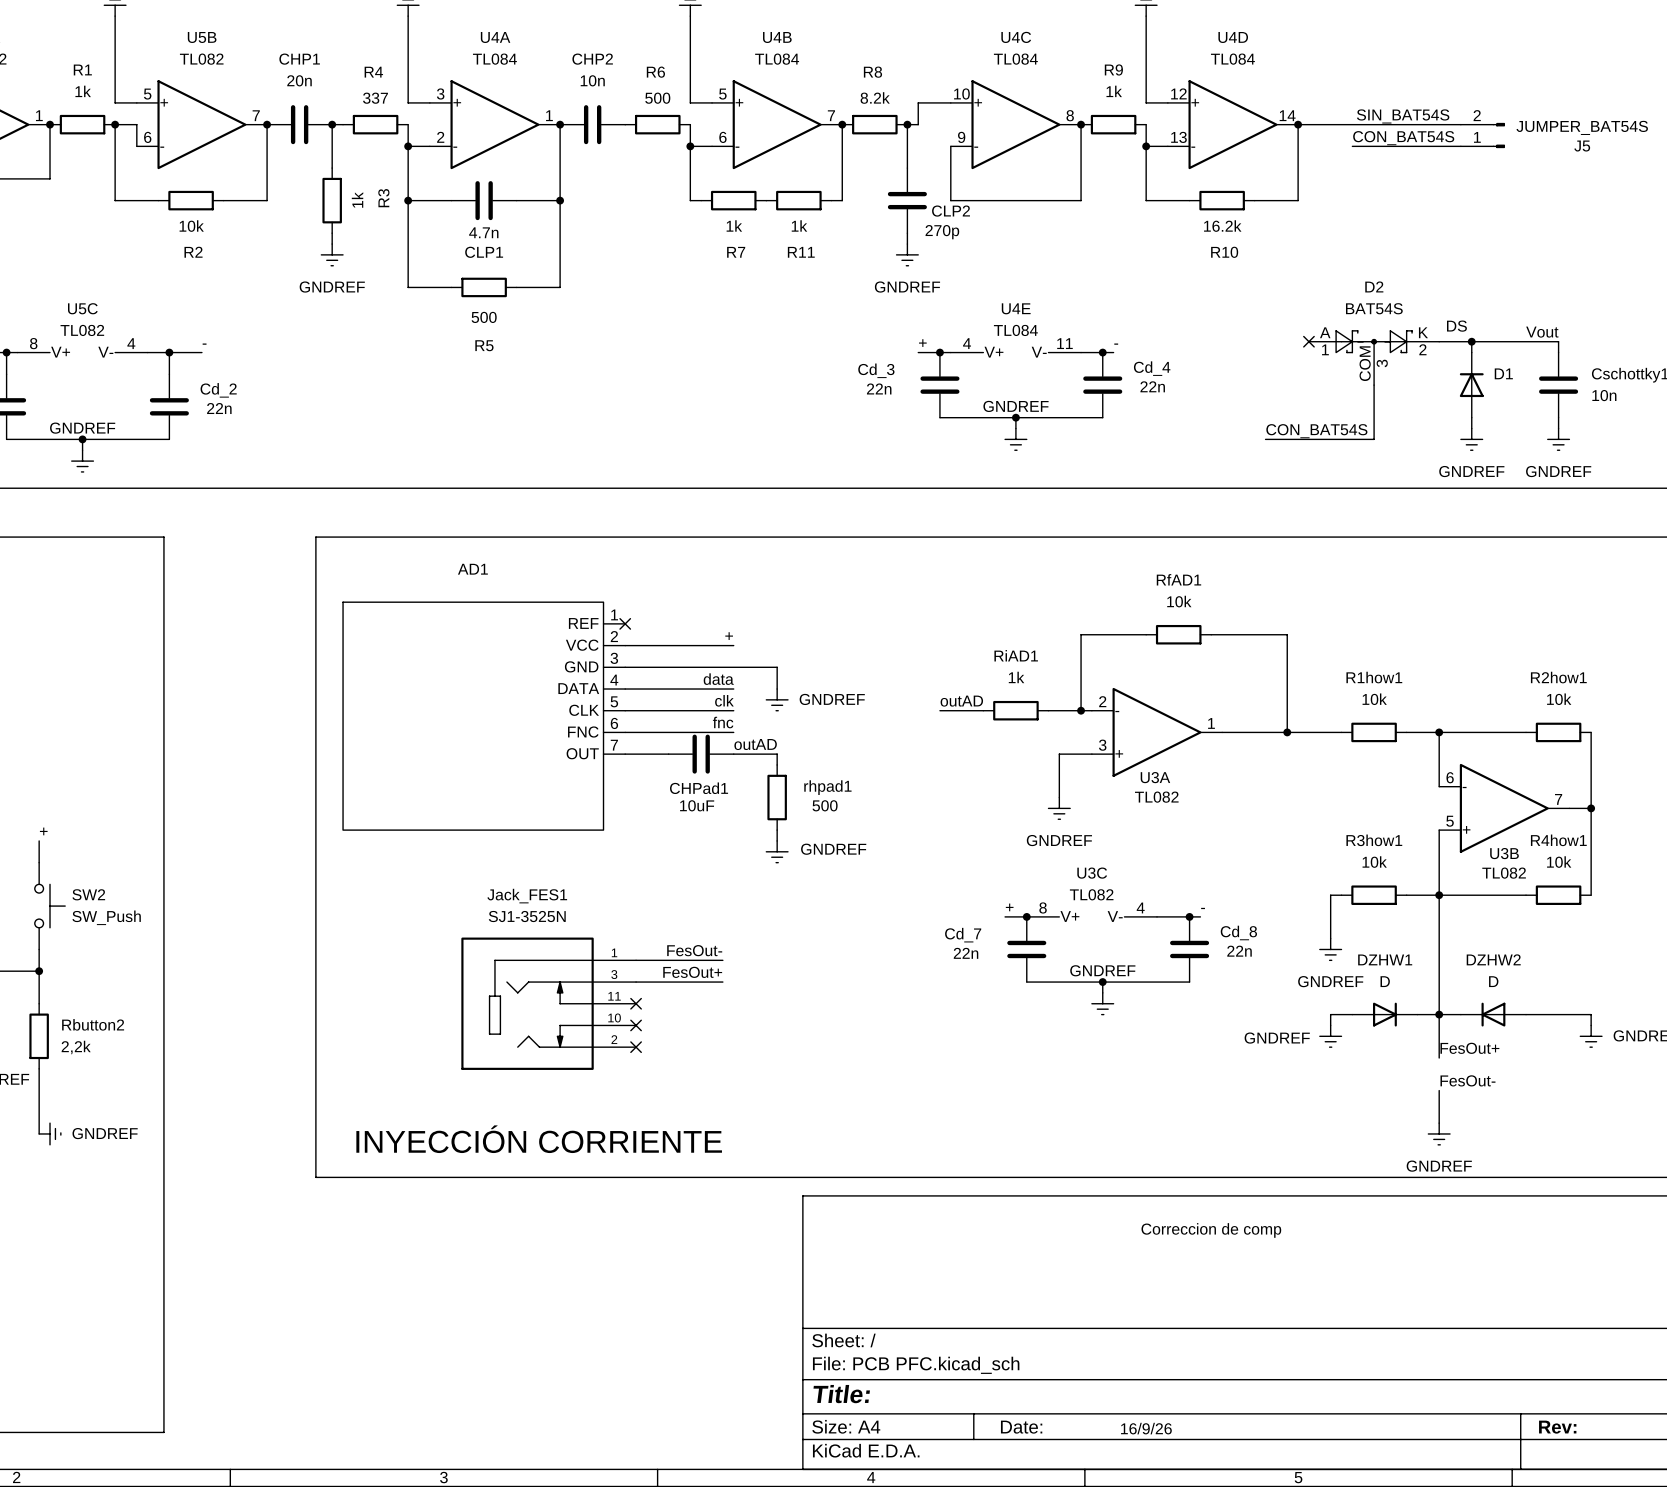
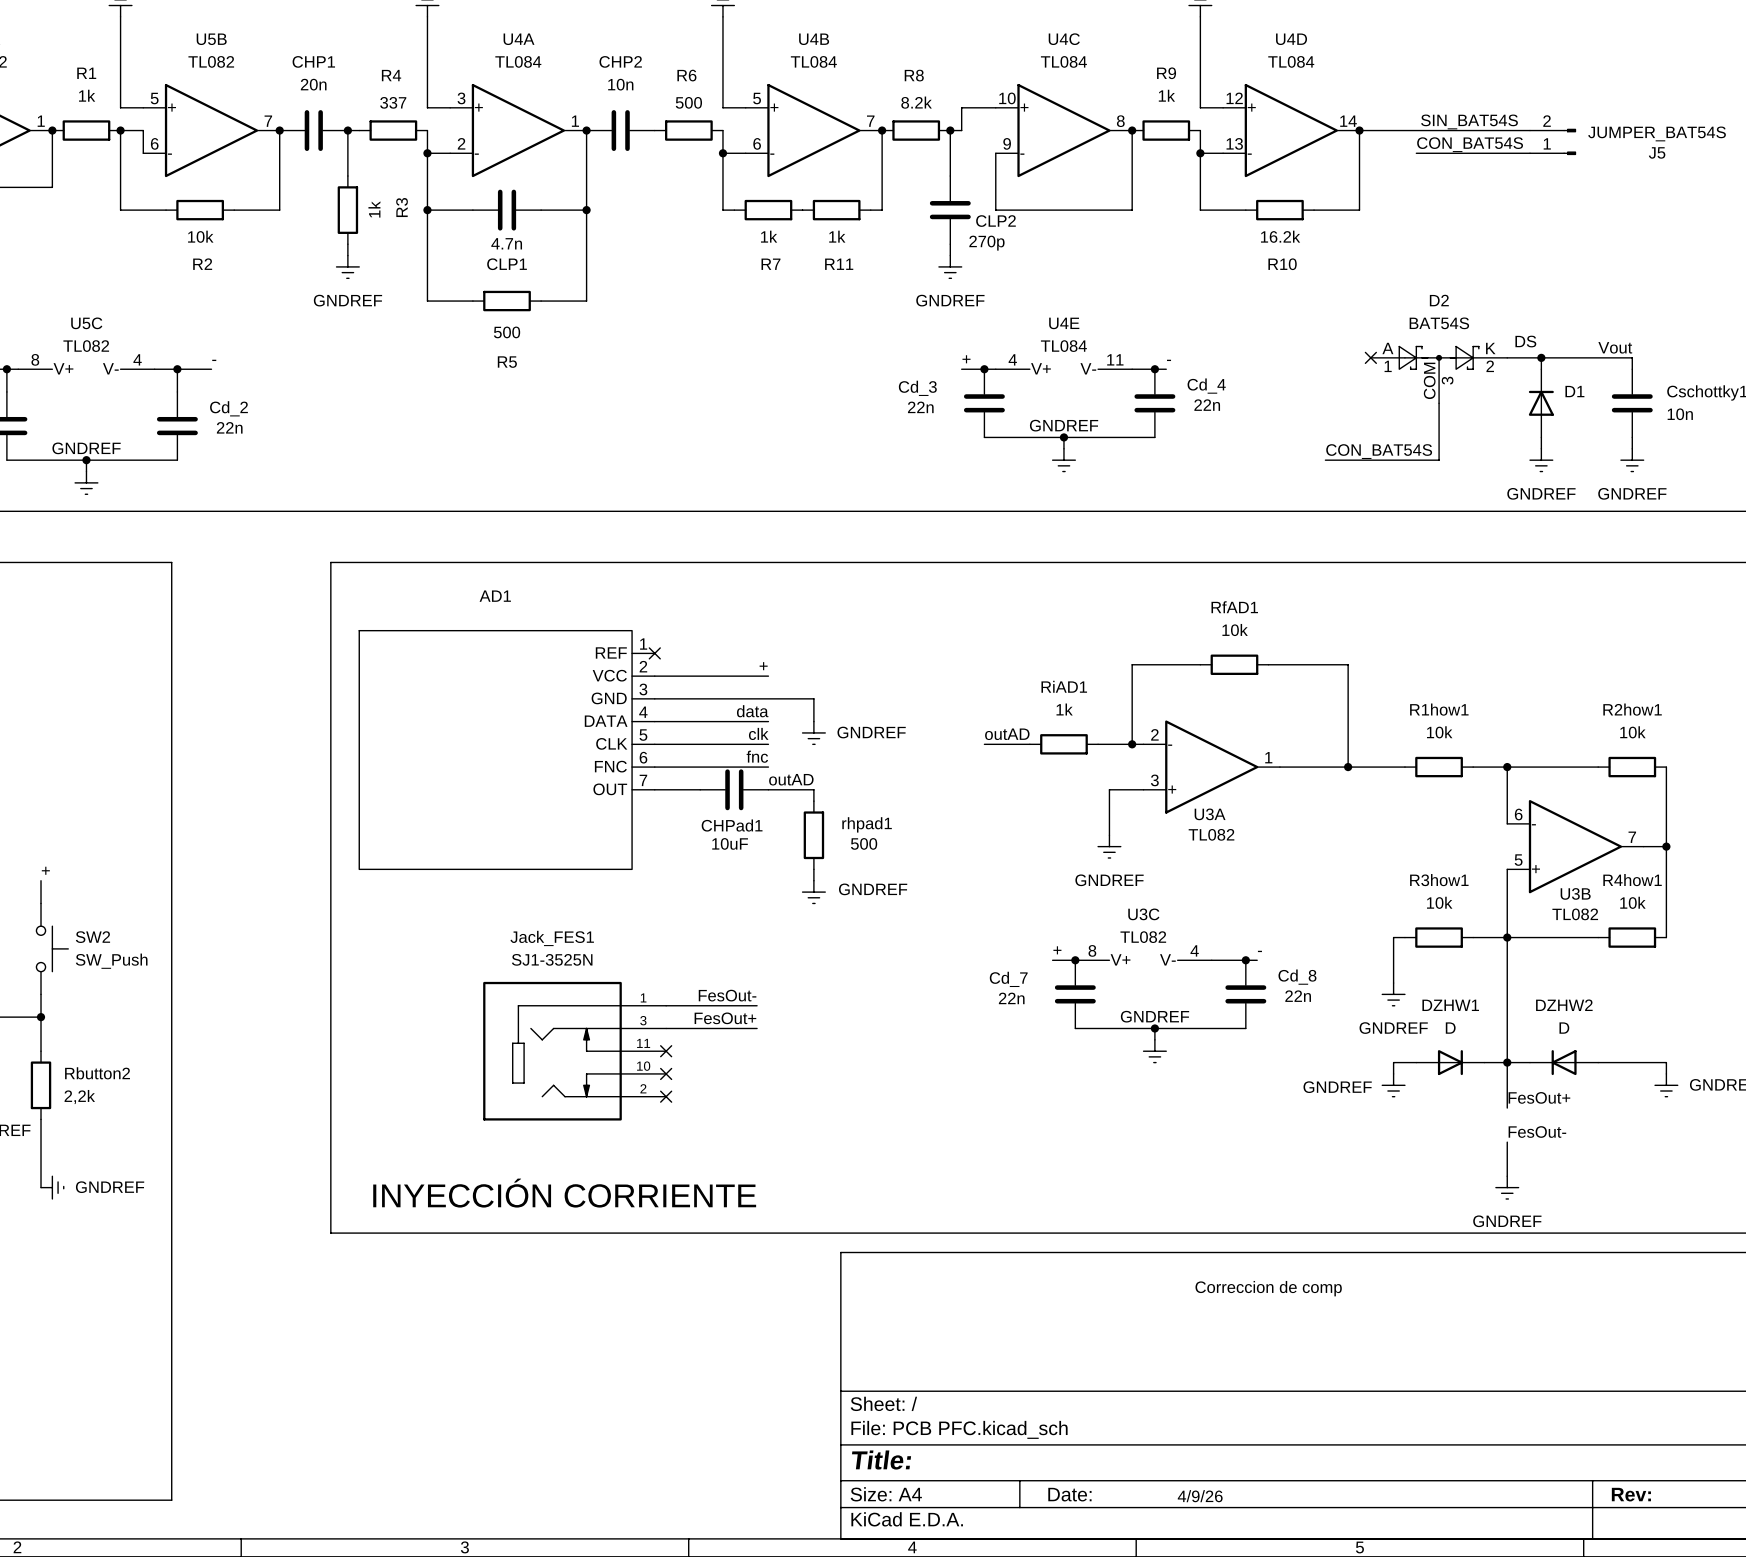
text: 16/9/26 (1146, 1428) -> 4/9/26 (1200, 1496)

